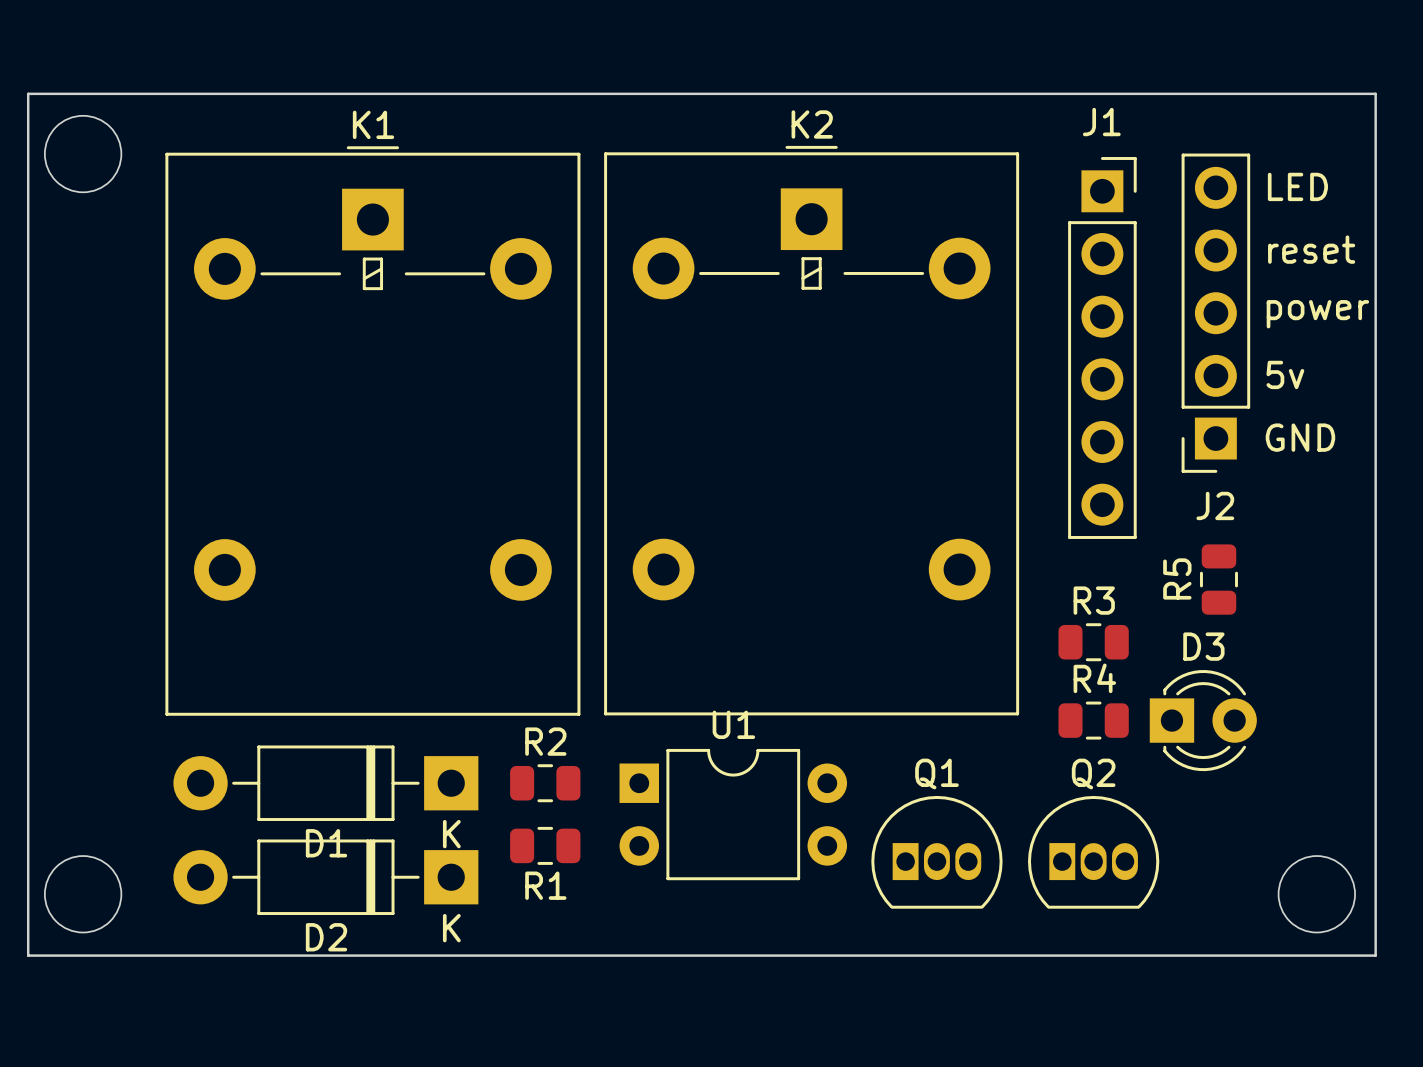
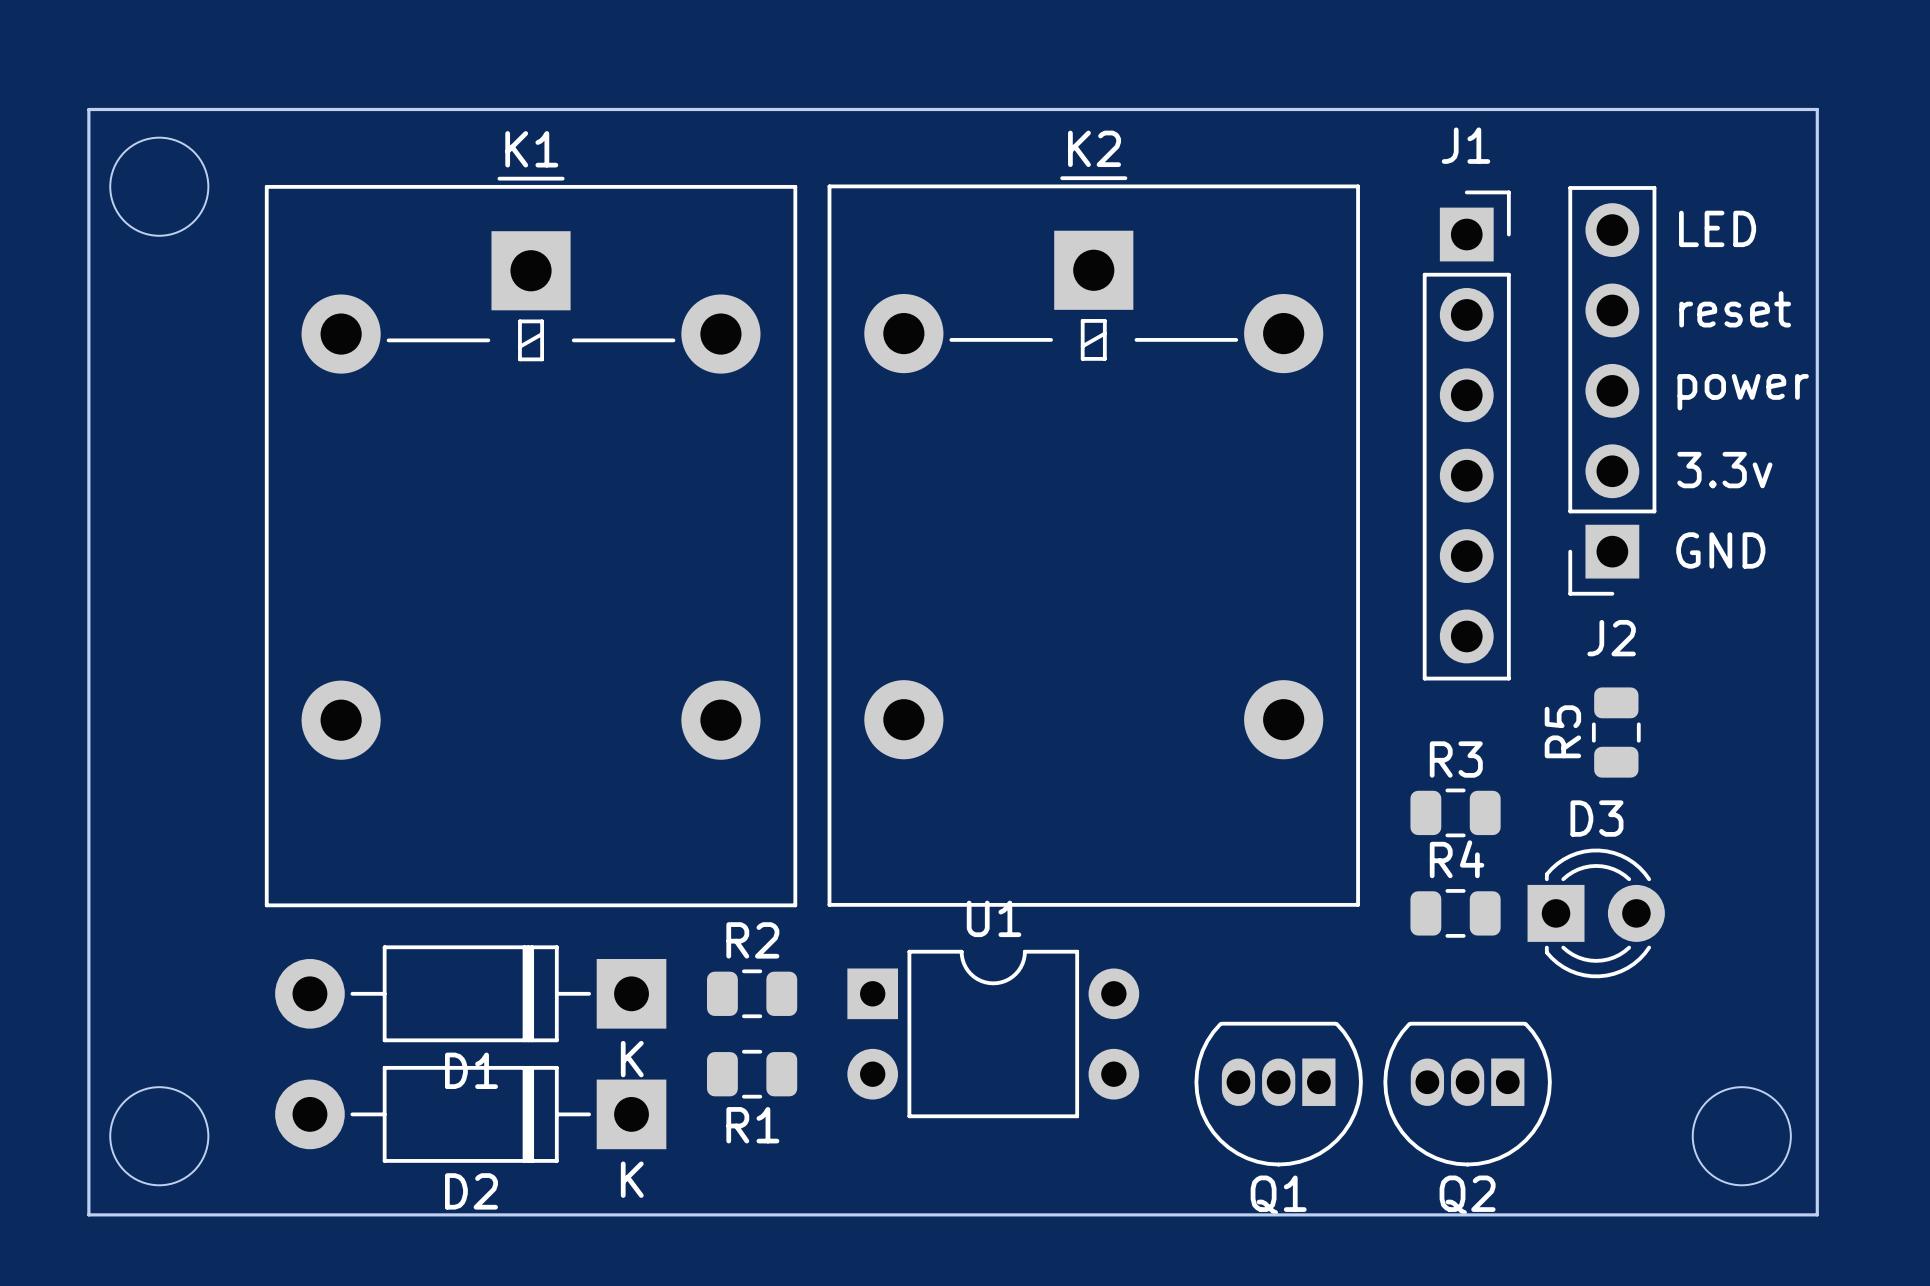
text: 5v (1285, 374) -> 3.3v (1724, 470)
Q1 rotation: 0° (936, 852) -> 180° (1278, 1094)
Q2 rotation: 0° (1093, 852) -> 180° (1467, 1094)

